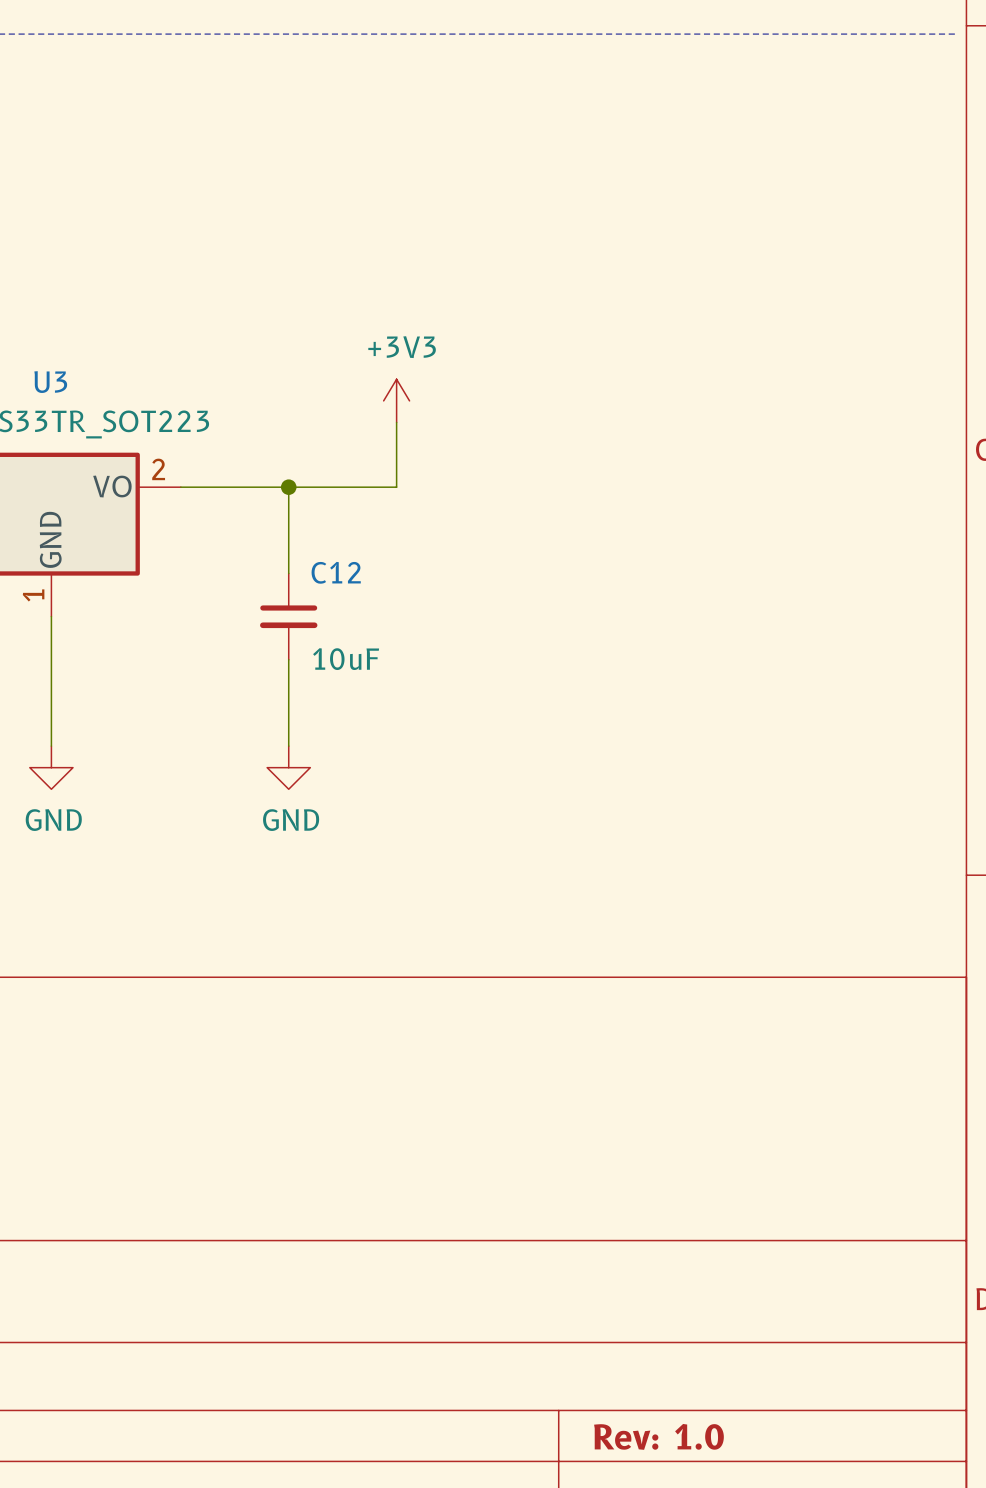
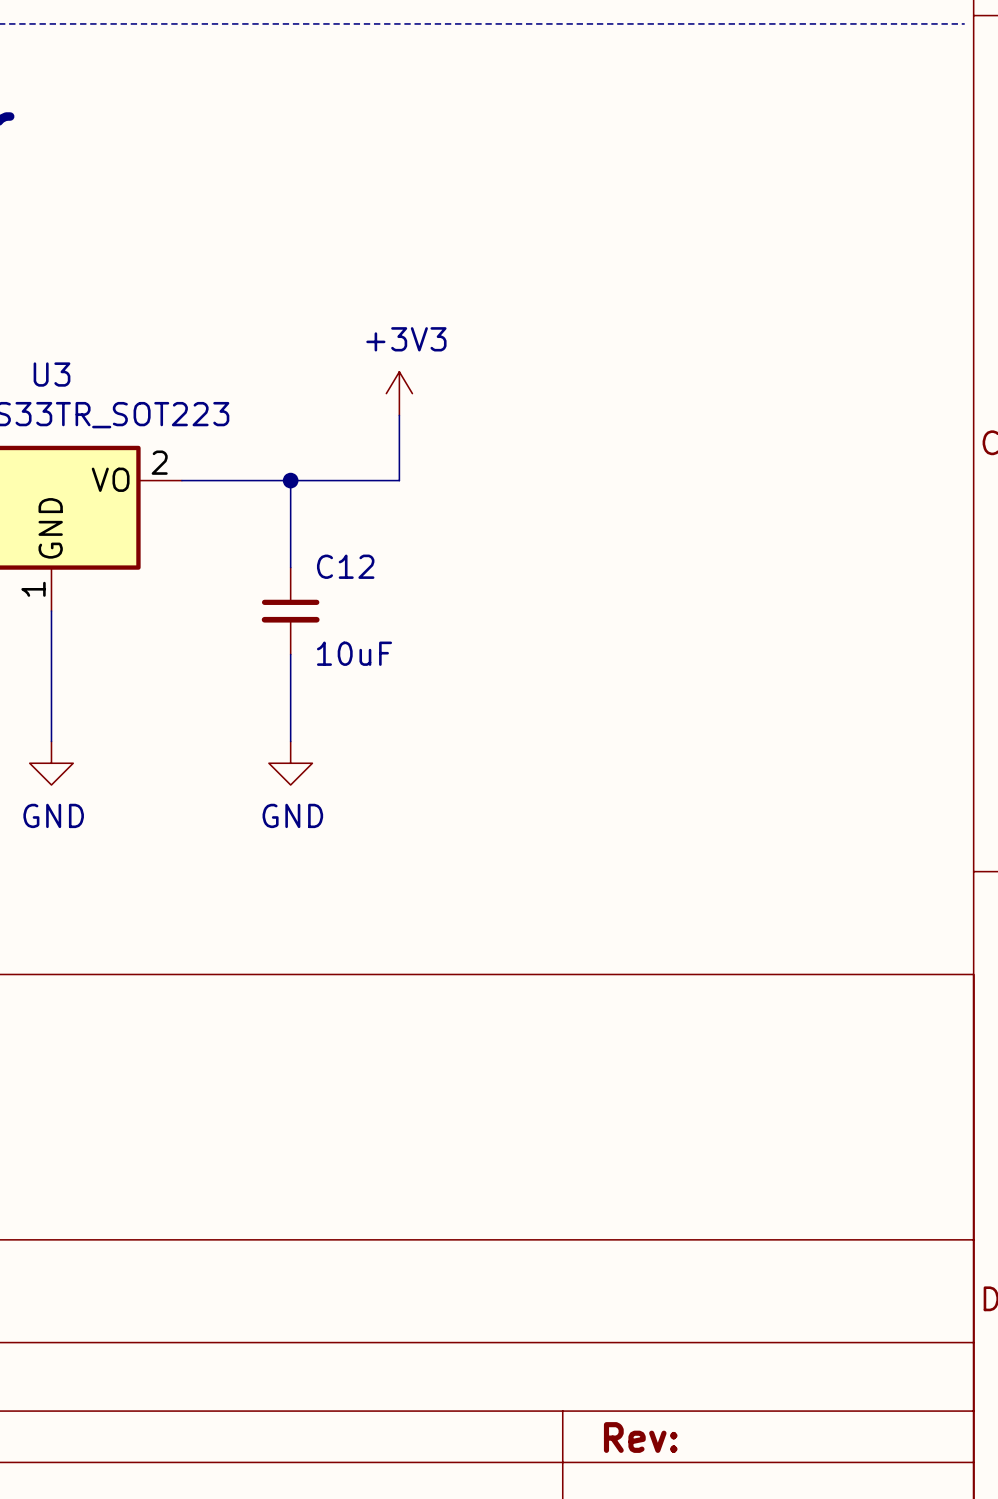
title block: Rev: 1.0 (658, 1436) -> Rev: (640, 1437)

